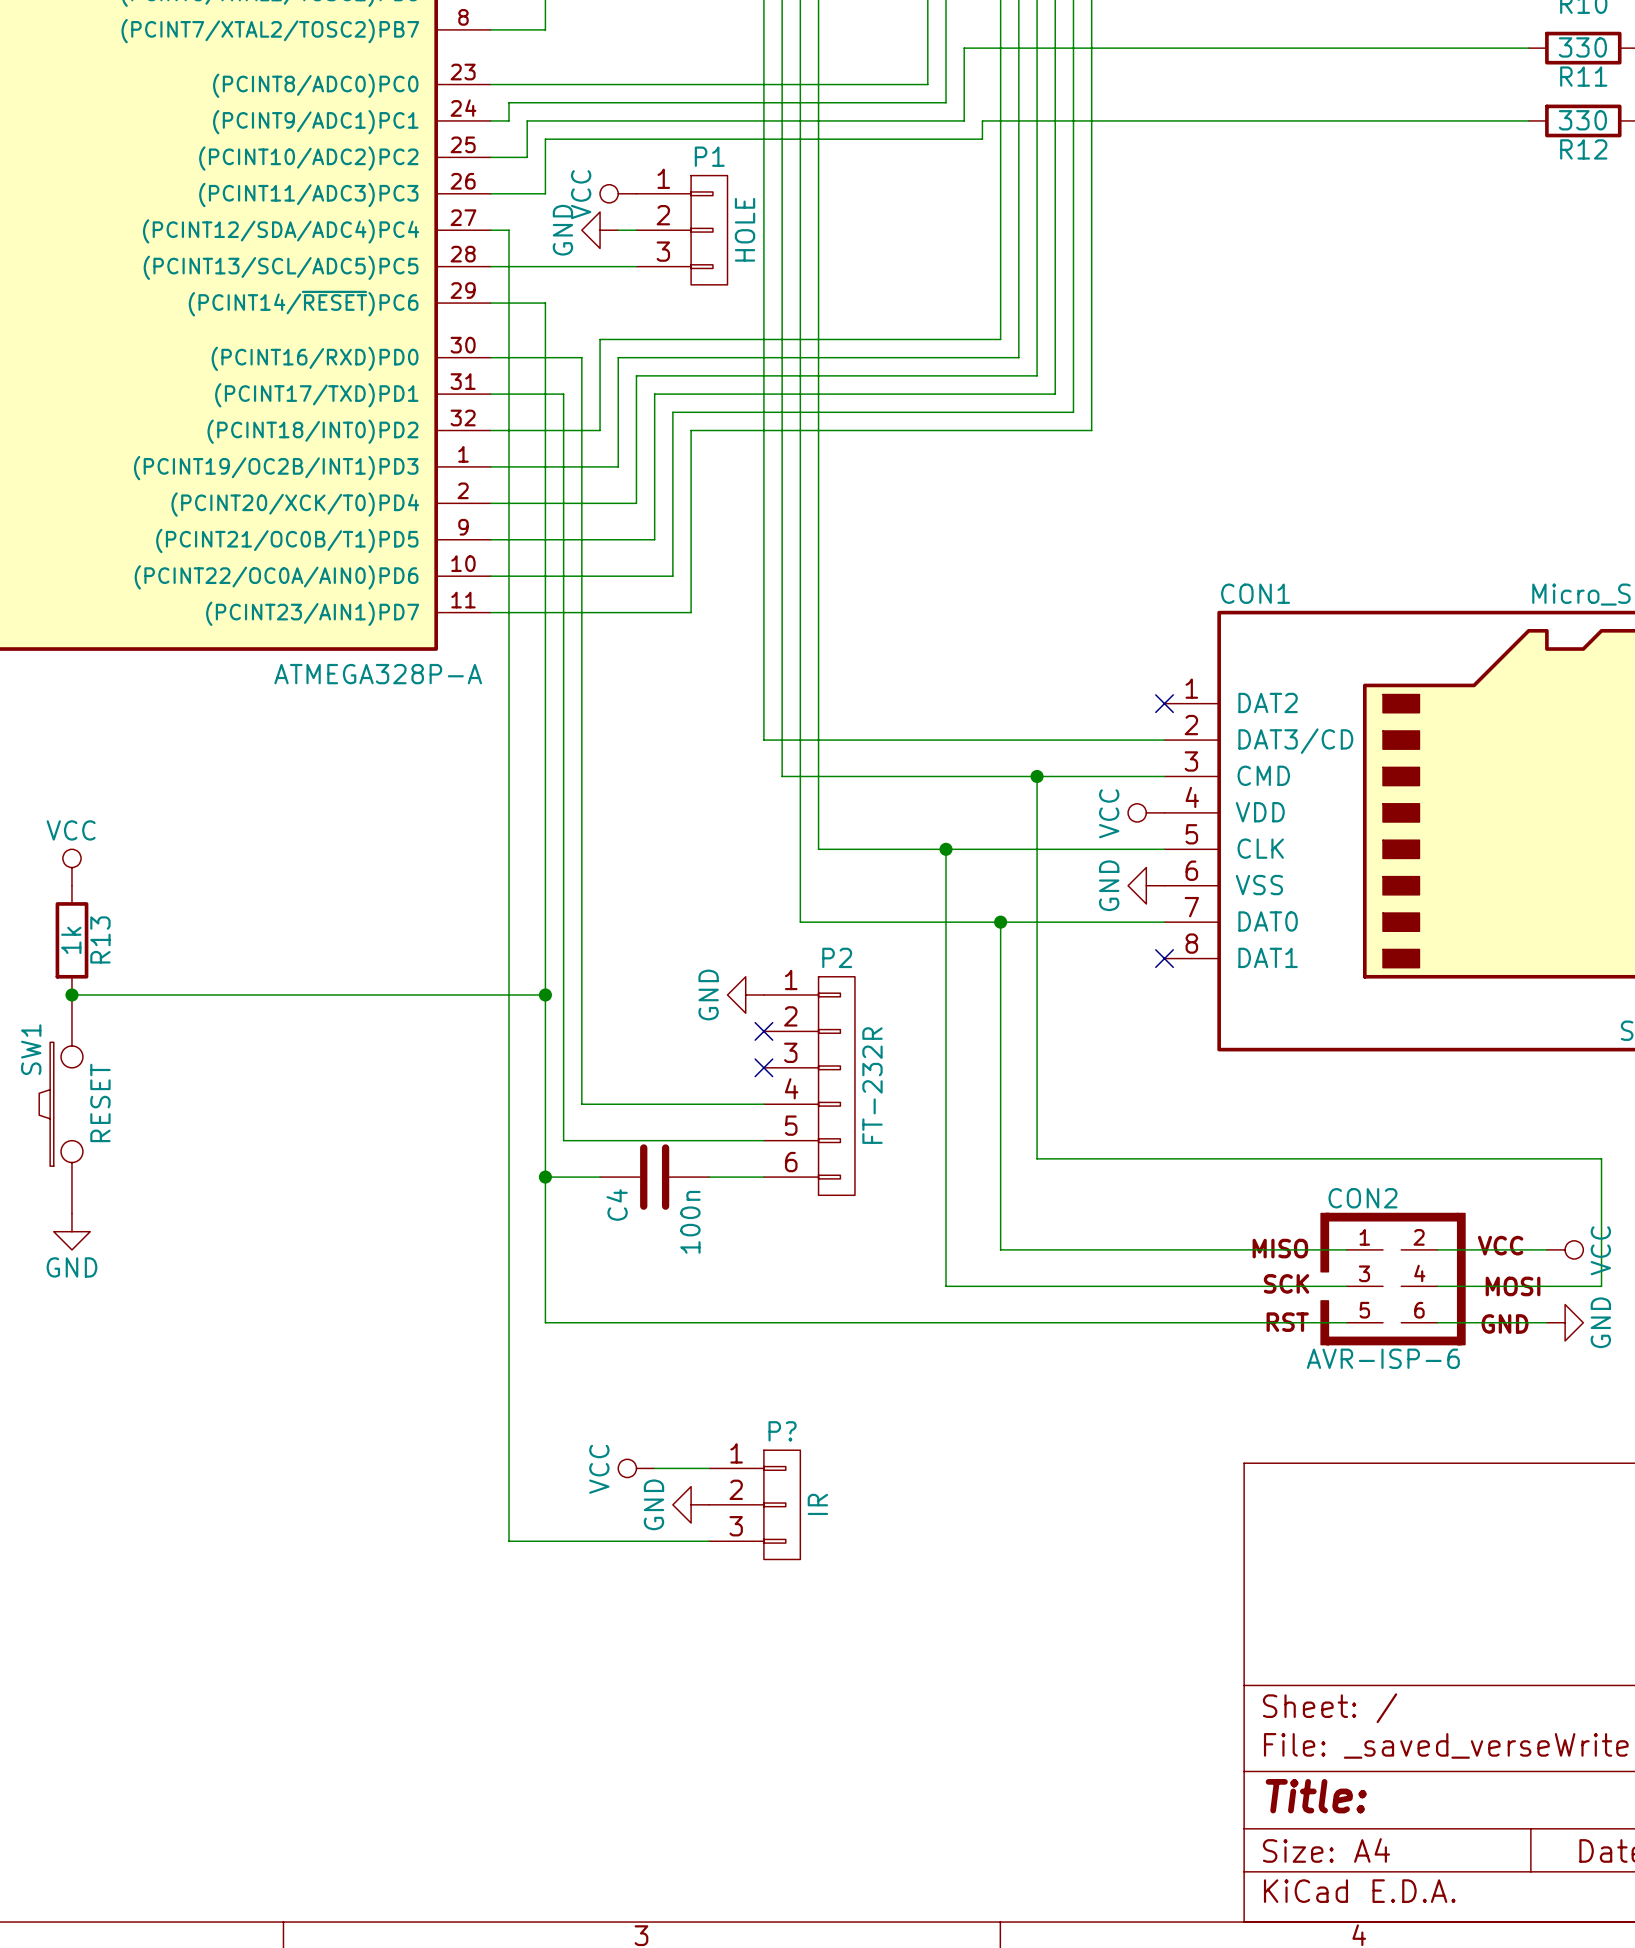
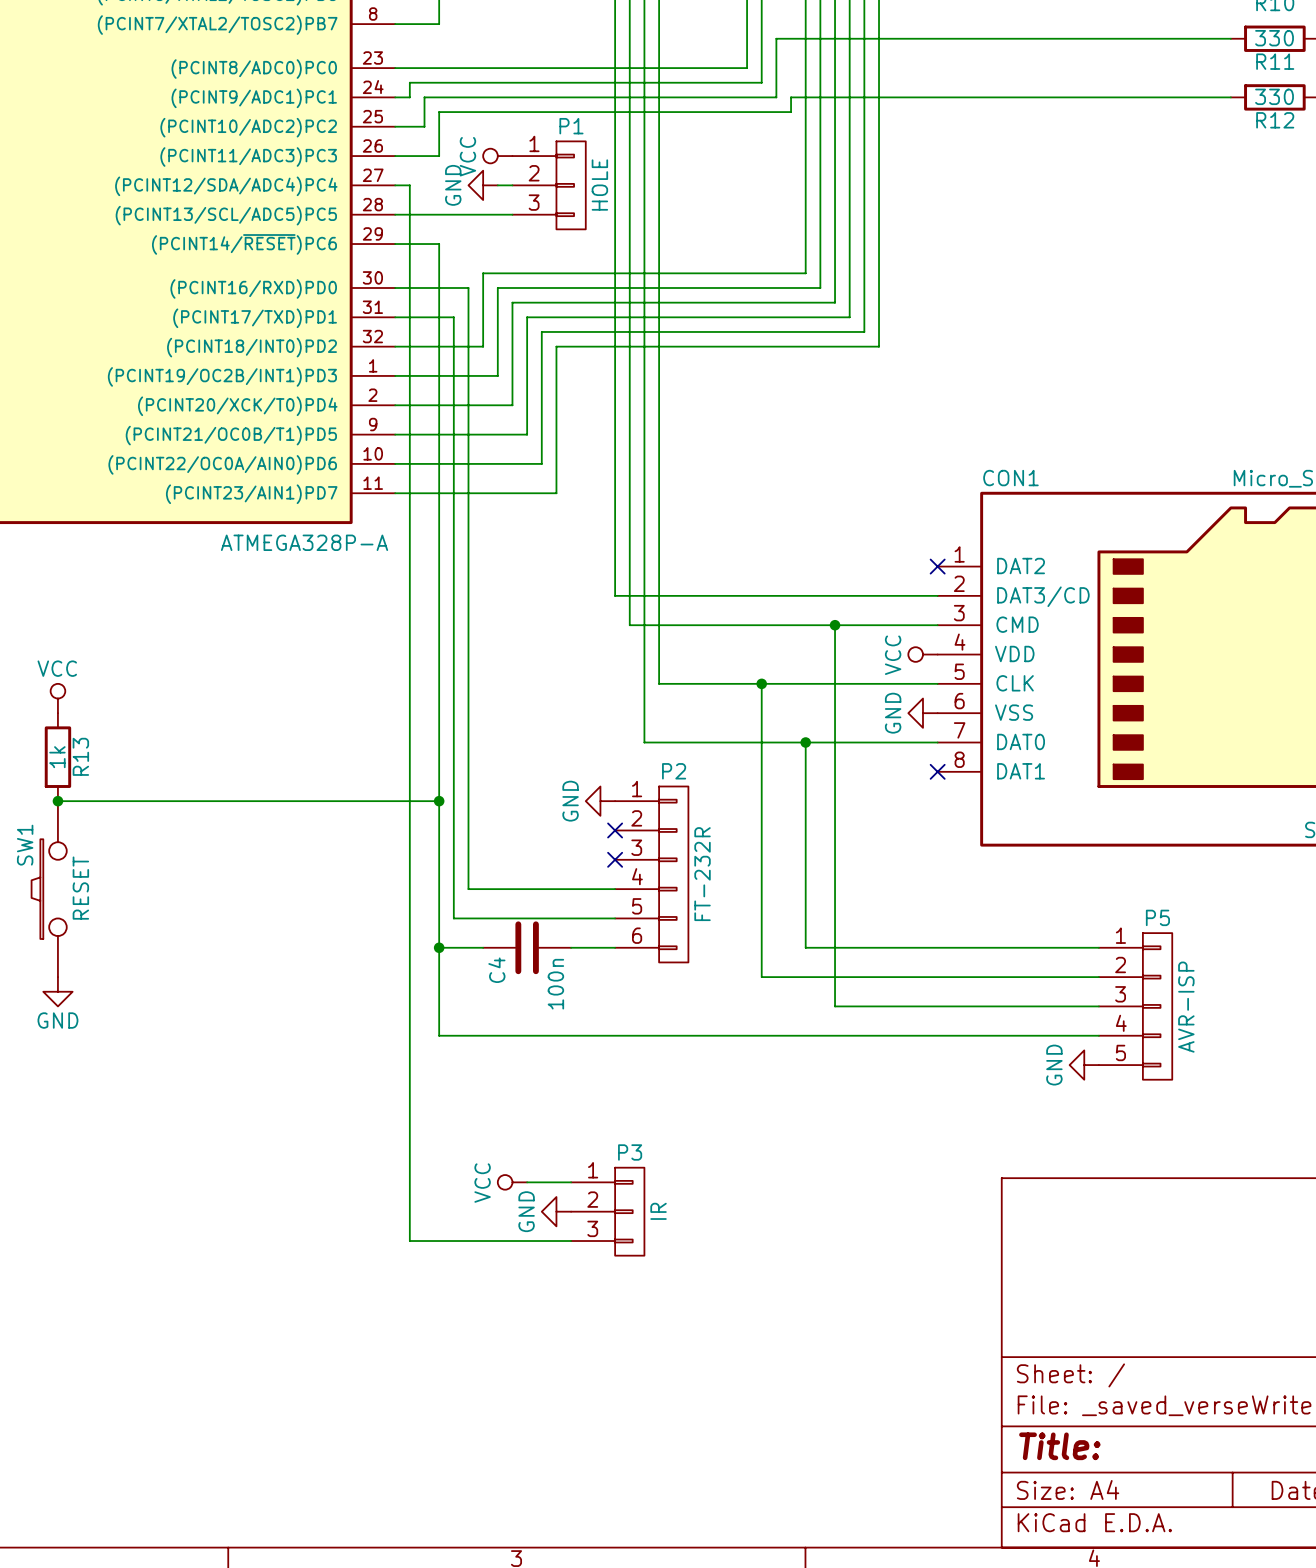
wire: (1037, 1158) (1601, 1158) (1601, 1286) (1437, 1286) -> none
wire: (1000, 1177) (1000, 1249) (1037, 1249) -> (835, 933) (835, 1006)
wire: none -> (805, 947) (1098, 947)
wire: (946, 1213) (946, 1286) -> (761, 977) (1098, 977)
P5: none -> AVR-ISP (1135, 1006)
wire: (1437, 1249) (1546, 1249) -> none
power symbol: VCC (1565, 1249) -> none
CON2: AVR-ISP-6 (1393, 1279) -> none
wire: (545, 1286) (545, 1322) (1346, 1322) -> (439, 1035) (761, 1035)
wire: (1437, 1322) (1546, 1322) -> none
power symbol rotation: 0° (1565, 1322) -> 180° (1084, 1065)
power symbol position: GND (1565, 1322) -> GND (1084, 1065)
P? name: P? (782, 1431) -> P3 (630, 1152)

